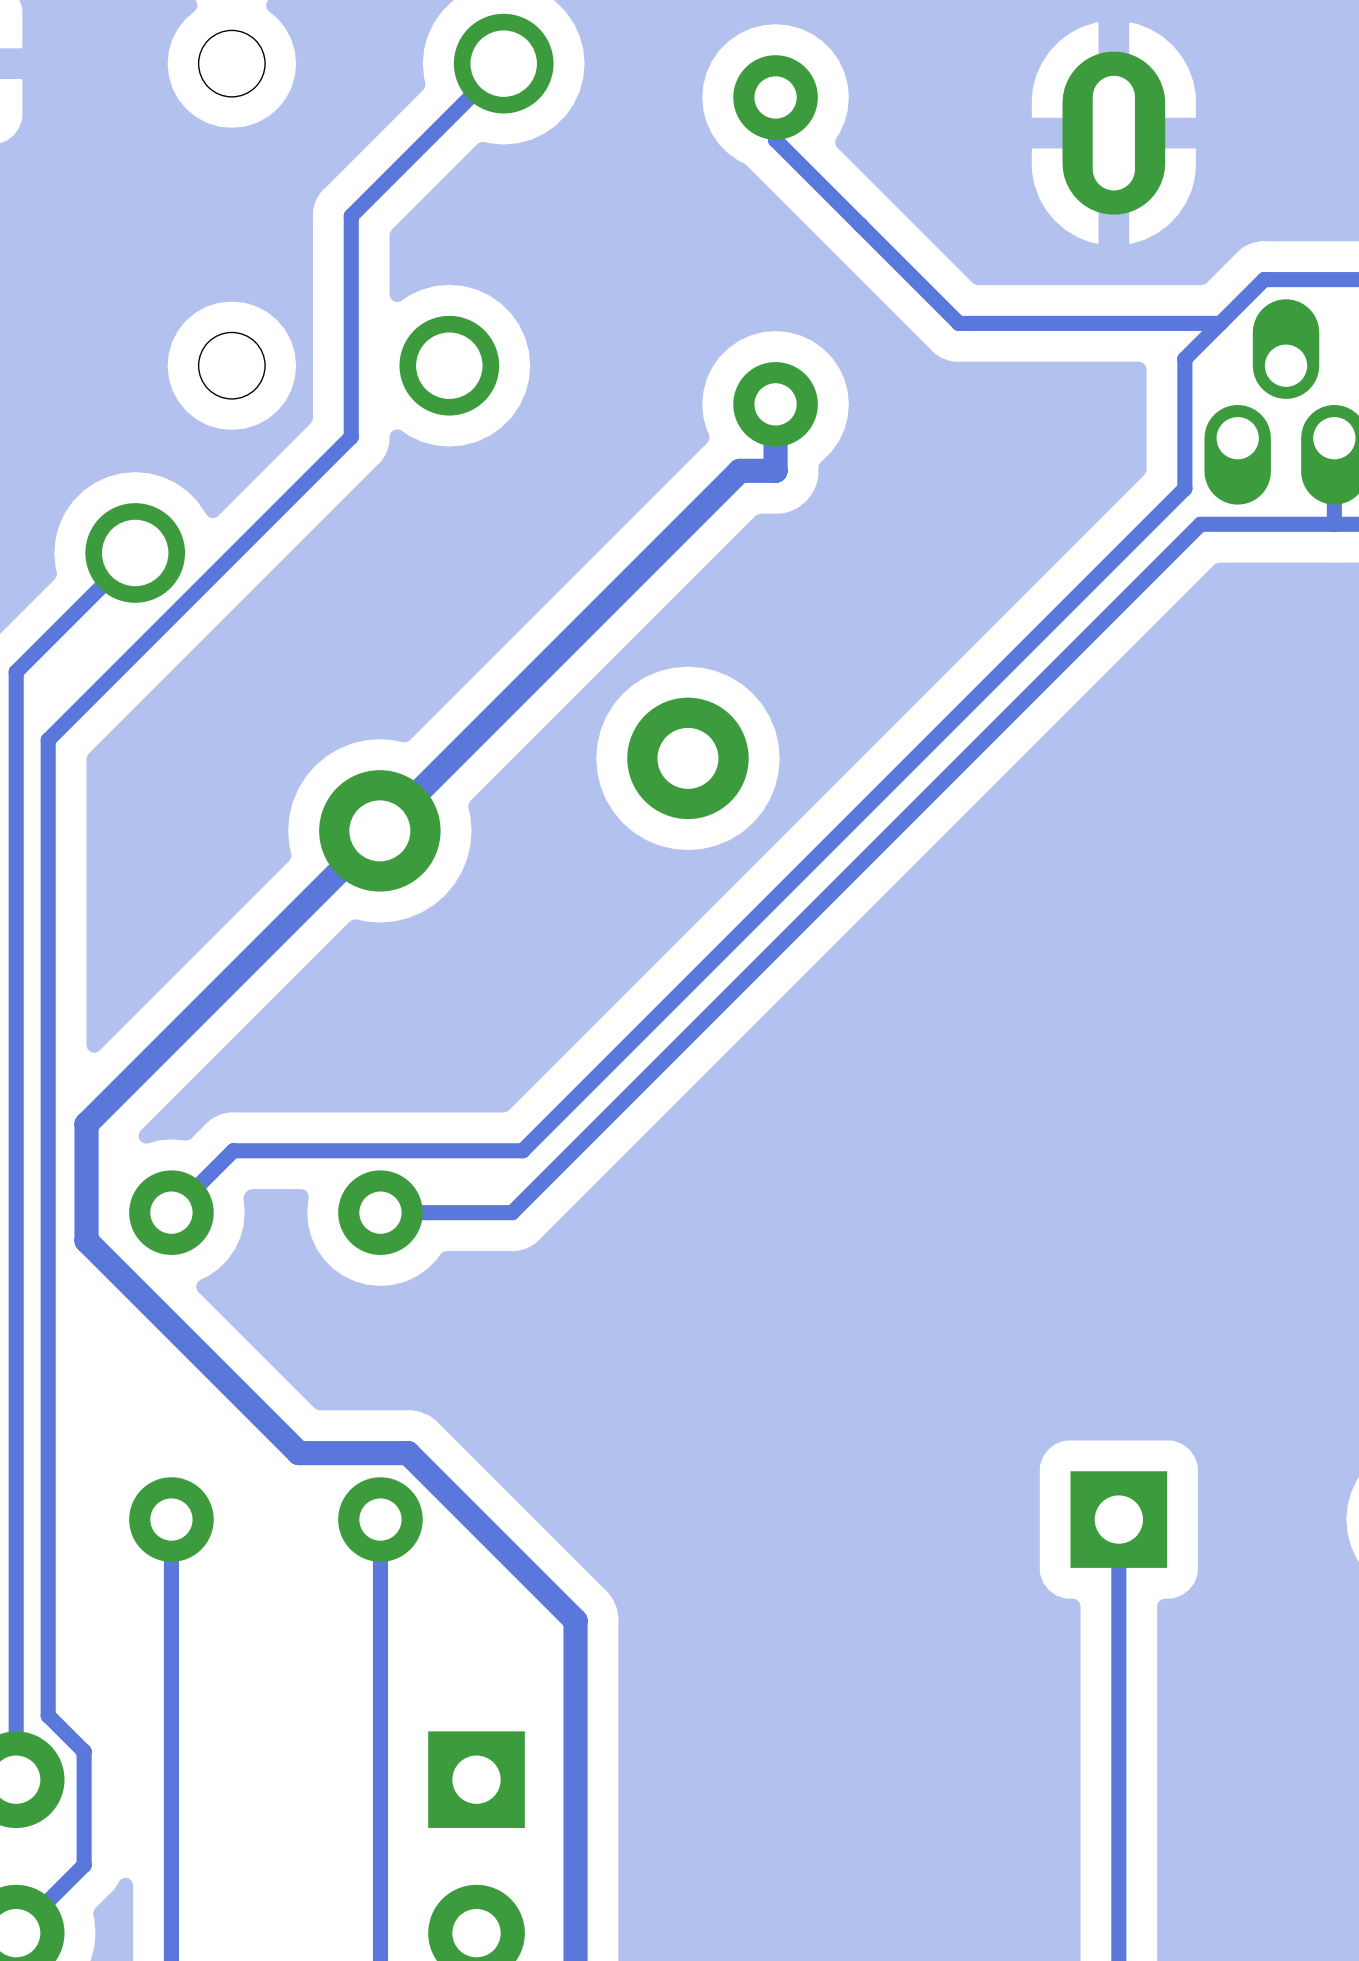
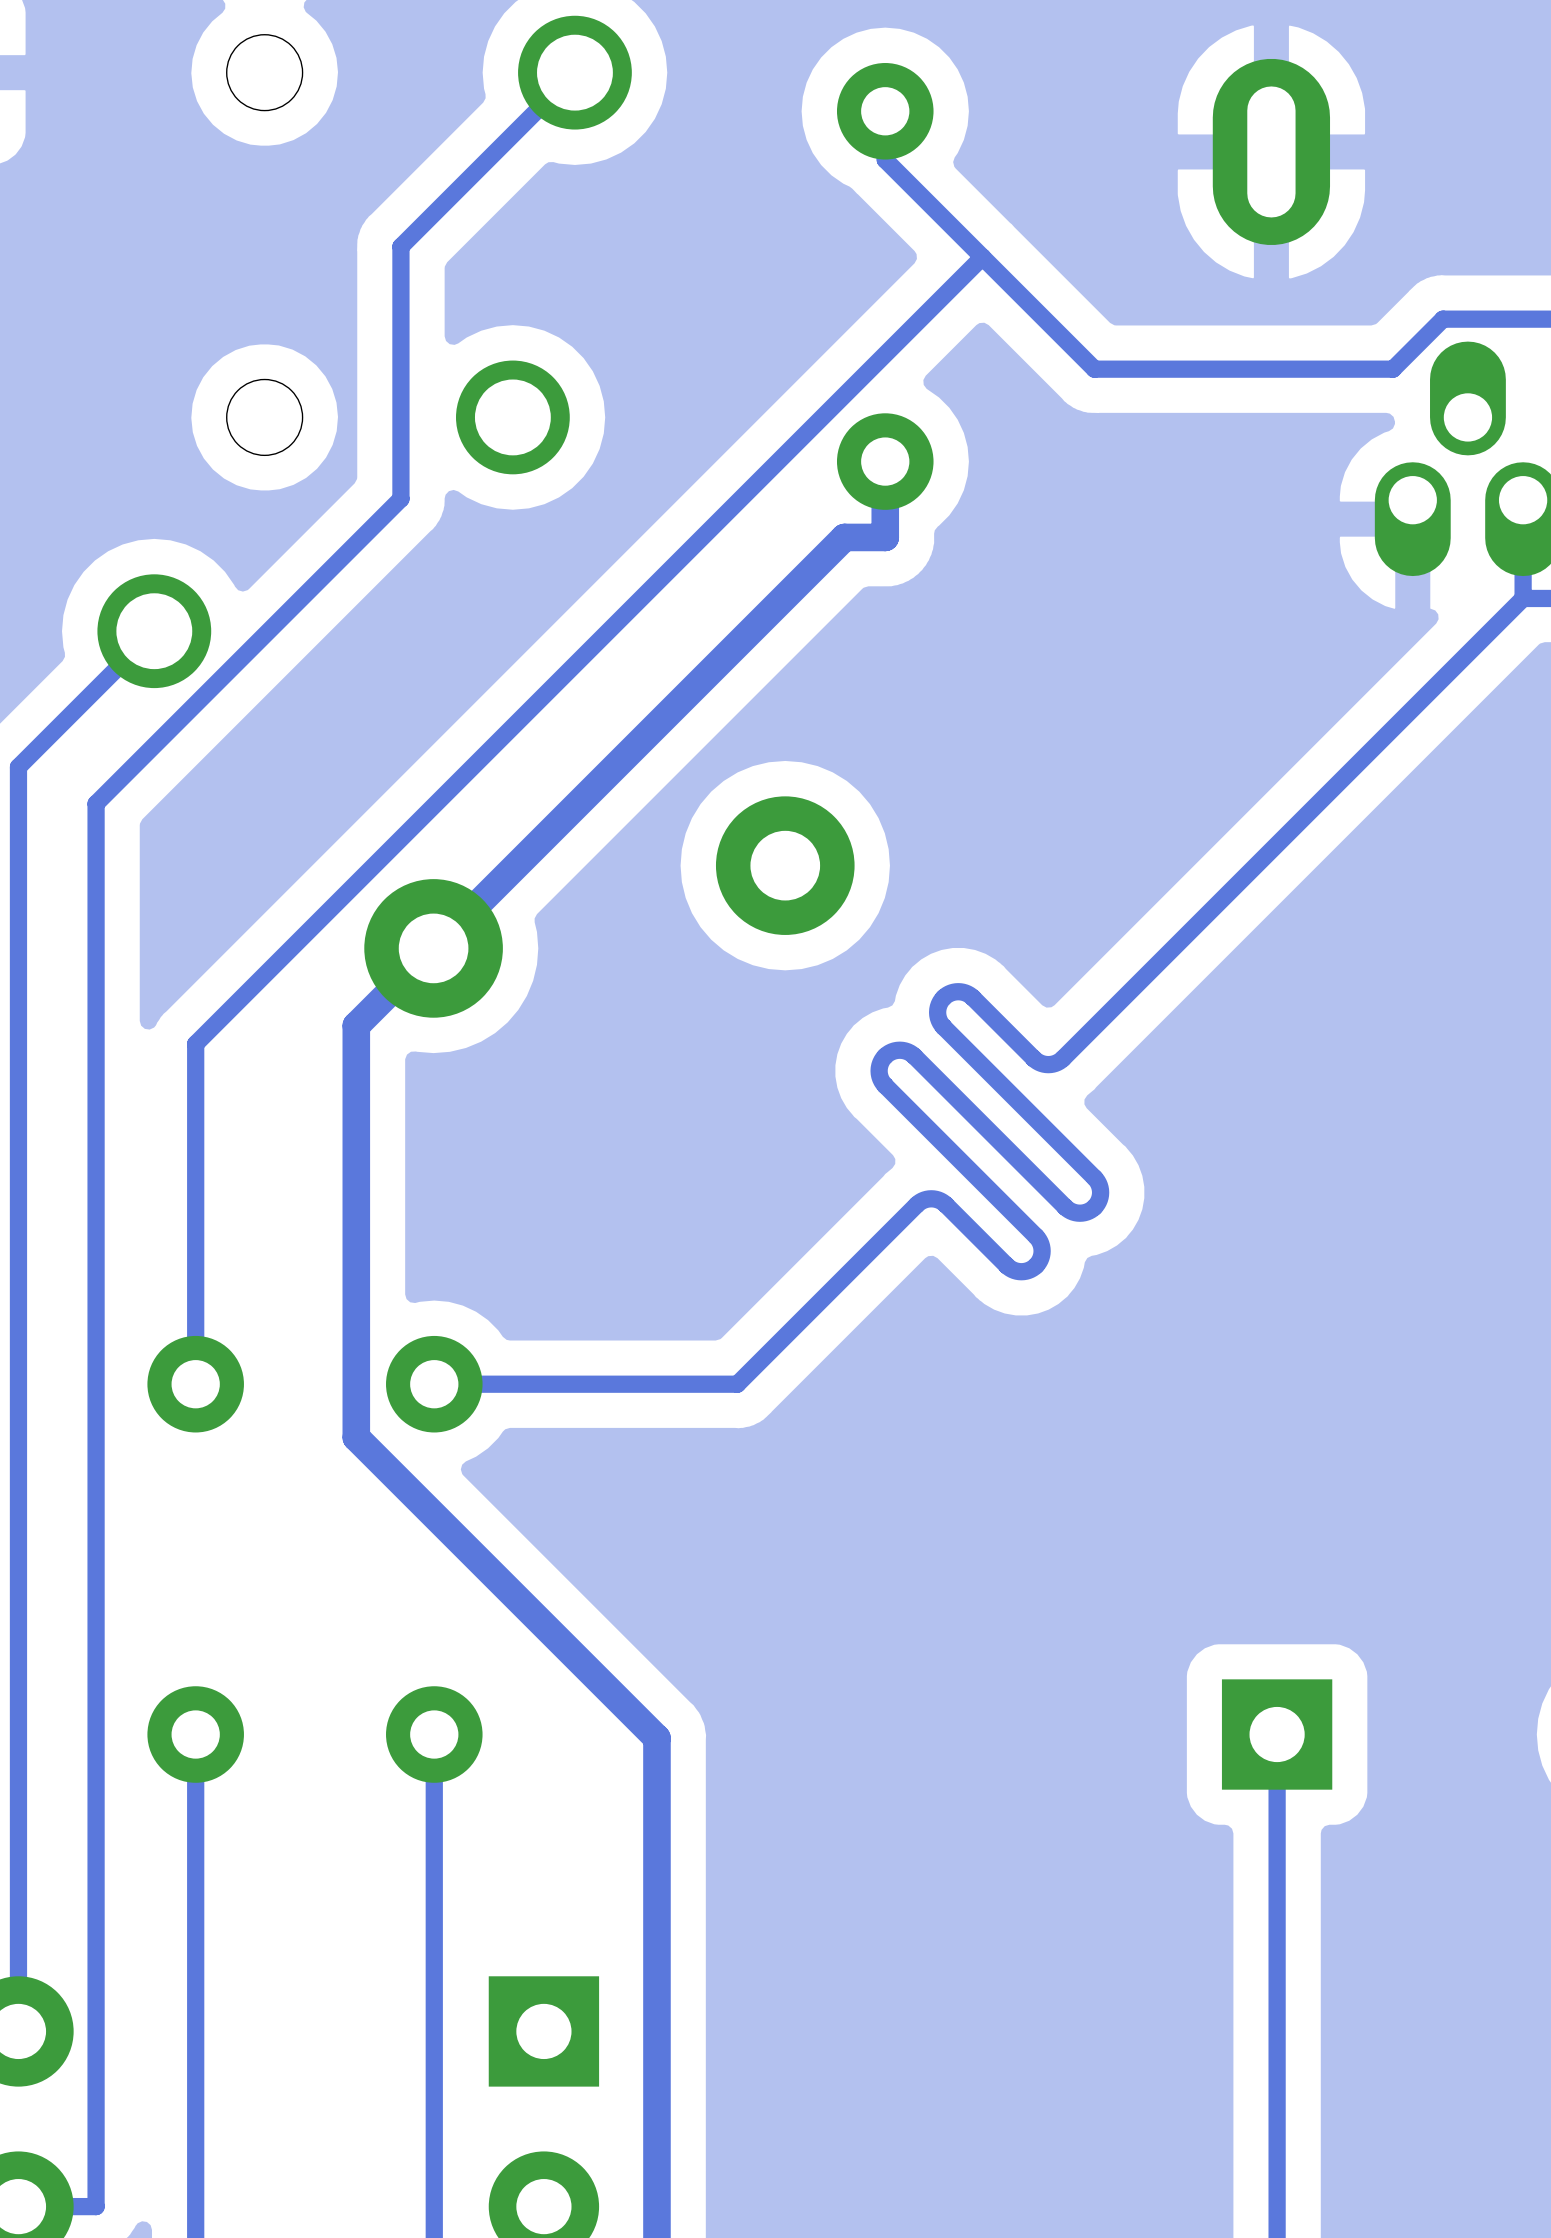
track: (1220, 323) (1184, 358) (1184, 488) (522, 1150) (233, 1150) (171, 1212) -> (982, 257) (195, 1043) (195, 1384)
track: (1334, 524) (1200, 524) (512, 1212) -> (1523, 598) (1059, 1061) (1046, 1064) (1035, 1060) (967, 993) (953, 992) (941, 999) (937, 1012) (941, 1024) (1096, 1179) (1099, 1185) (1100, 1194) (1097, 1203) (1092, 1208) (1079, 1213) (1067, 1208) (912, 1054) (905, 1050) (897, 1050) (889, 1052) (883, 1058) (879, 1070) (883, 1083) (1037, 1238) (1040, 1244) (1041, 1253) (1038, 1262) (1034, 1267) (1021, 1271) (1010, 1268) (944, 1203) (935, 1199) (926, 1199) (916, 1204) (737, 1384) (584, 1384)
track: (84, 704) (48, 740) (48, 1715) (84, 1751) (84, 1865) (16, 1933) -> (96, 803) (96, 2206) (18, 2206)
track: (312, 898) (86, 1124) (86, 1240) (298, 1453) (407, 1453) (575, 1620) -> (356, 1025) (356, 1437) (656, 1738) (656, 1849)

